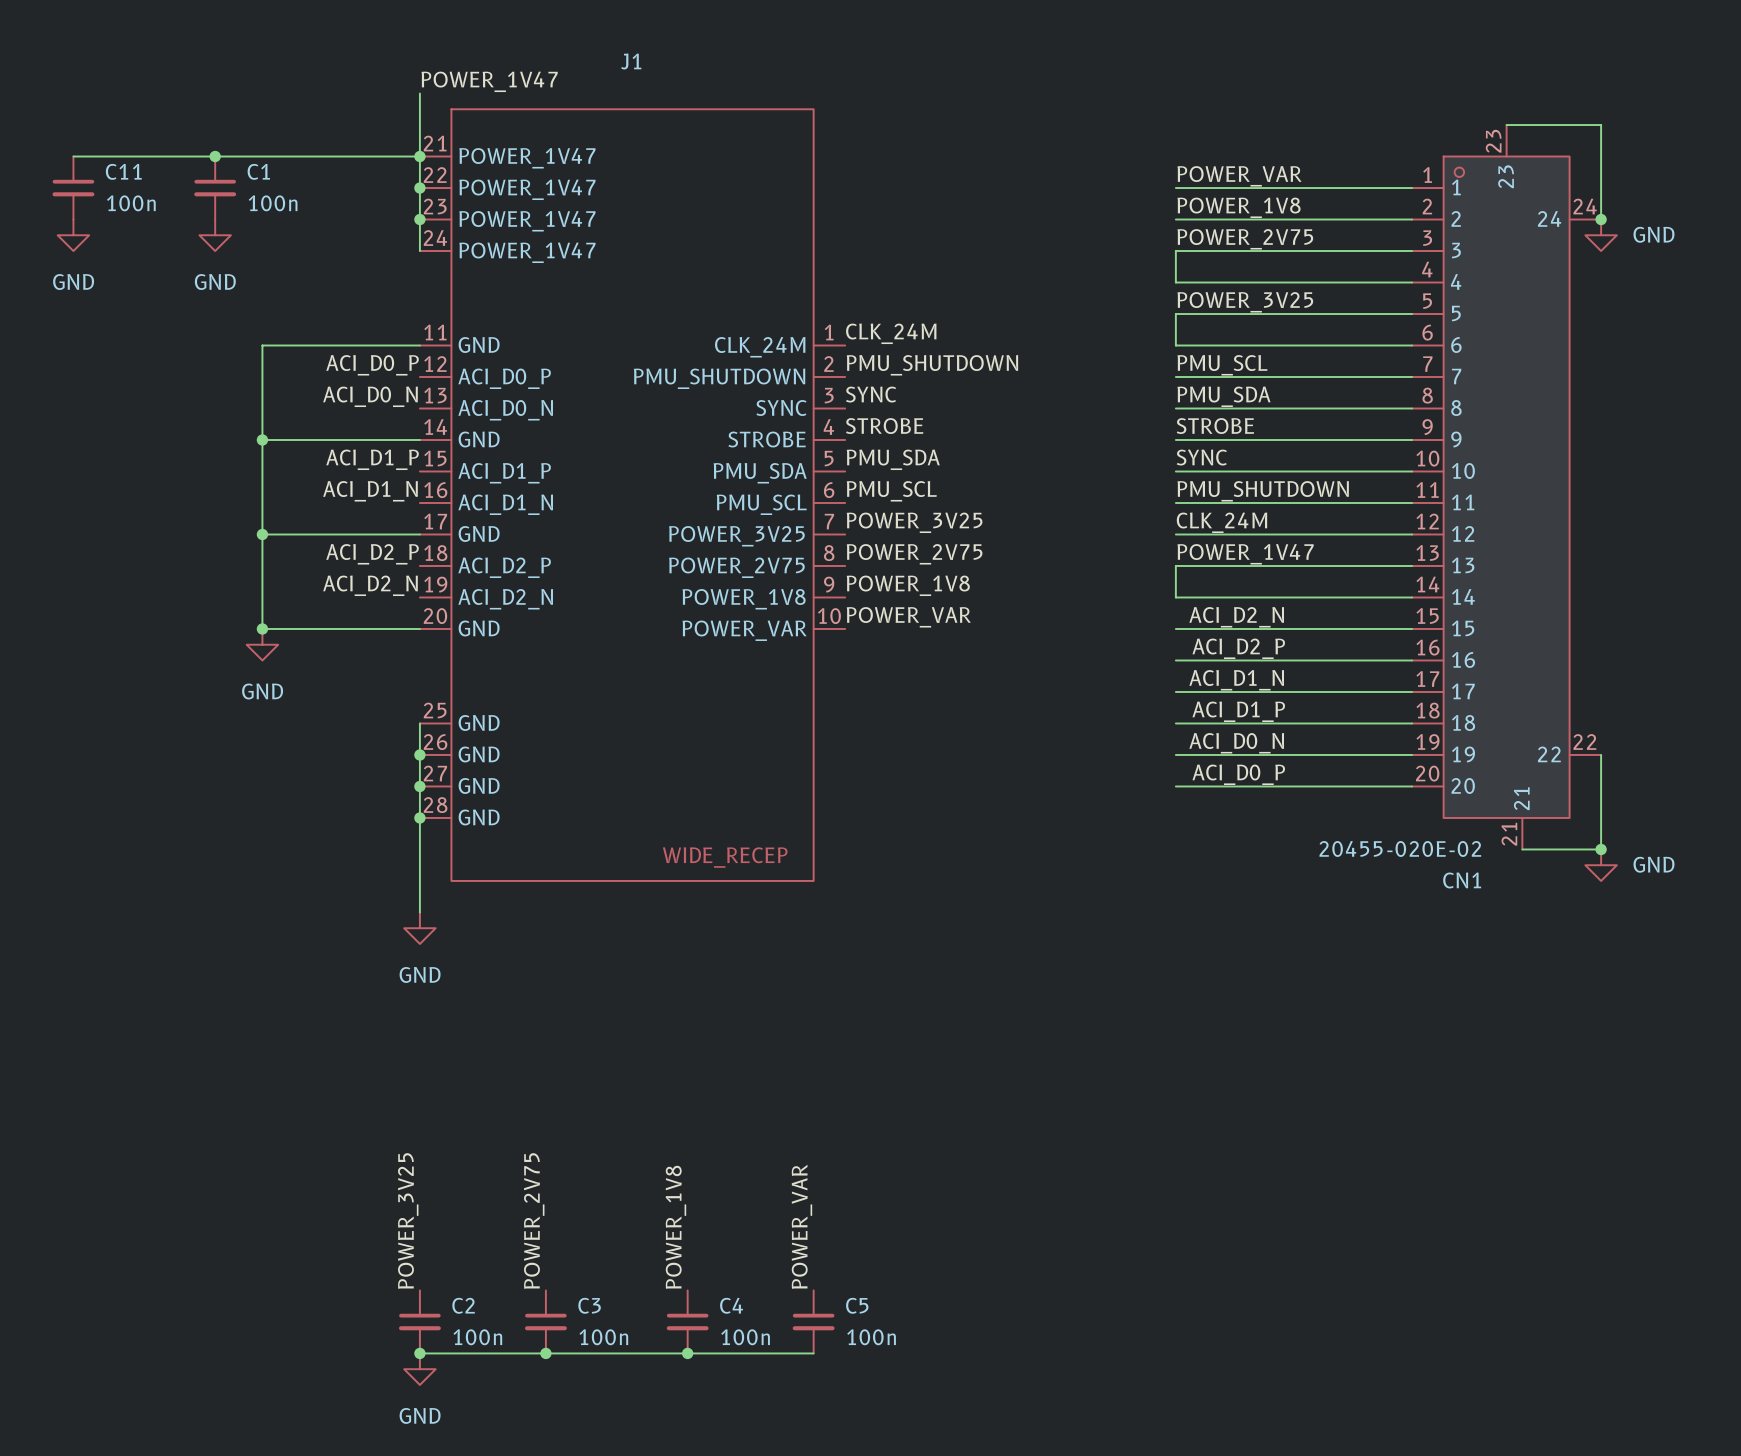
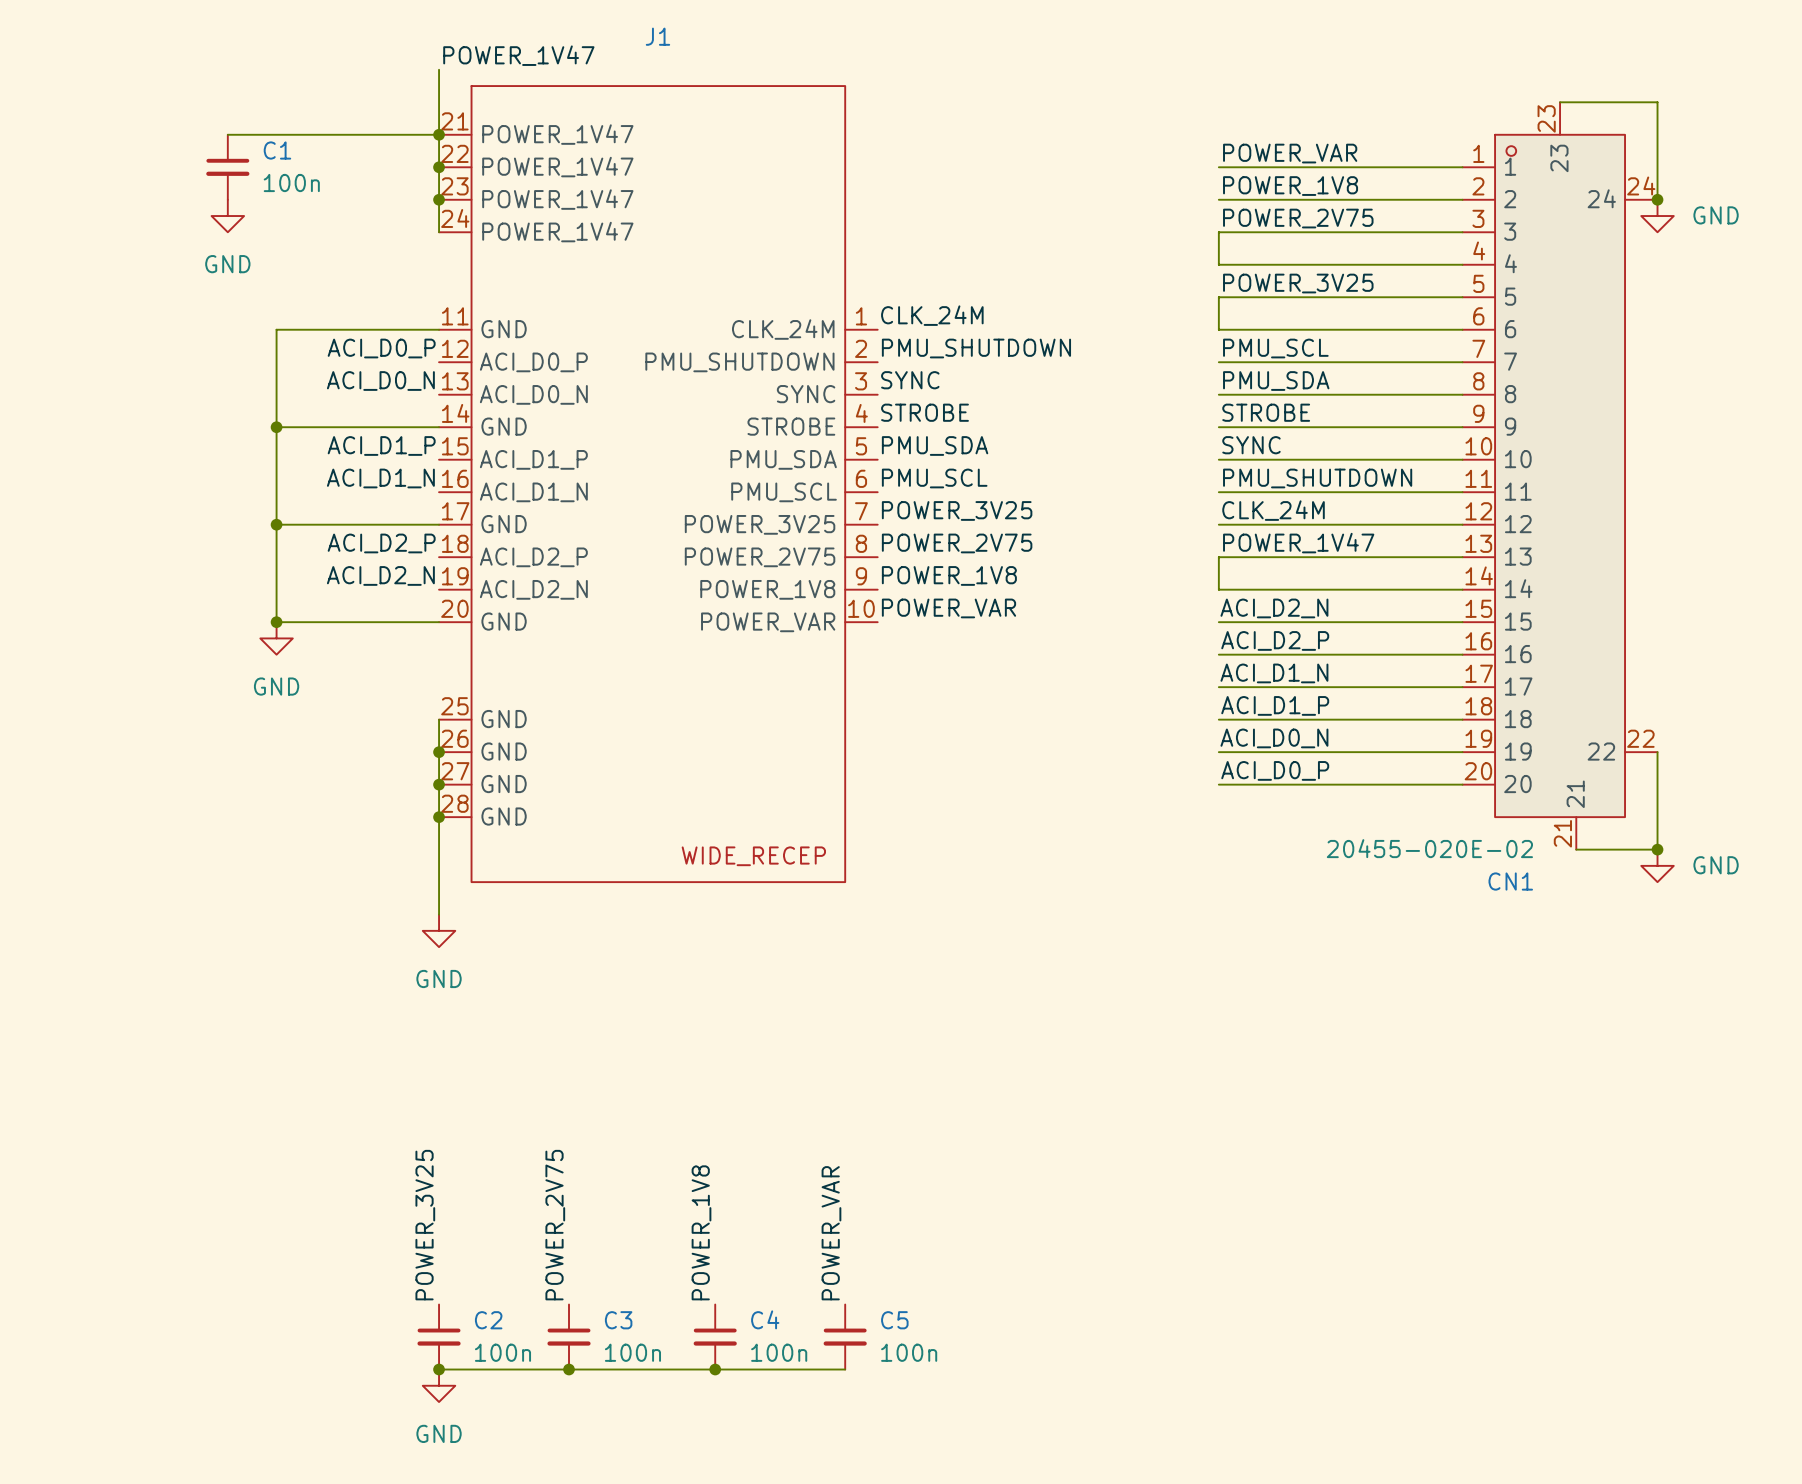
wire: (73, 156) (215, 156) -> none
junction: (215, 156) -> none
C11: 100n (73, 188) -> none
power symbol: GND (73, 235) -> none

